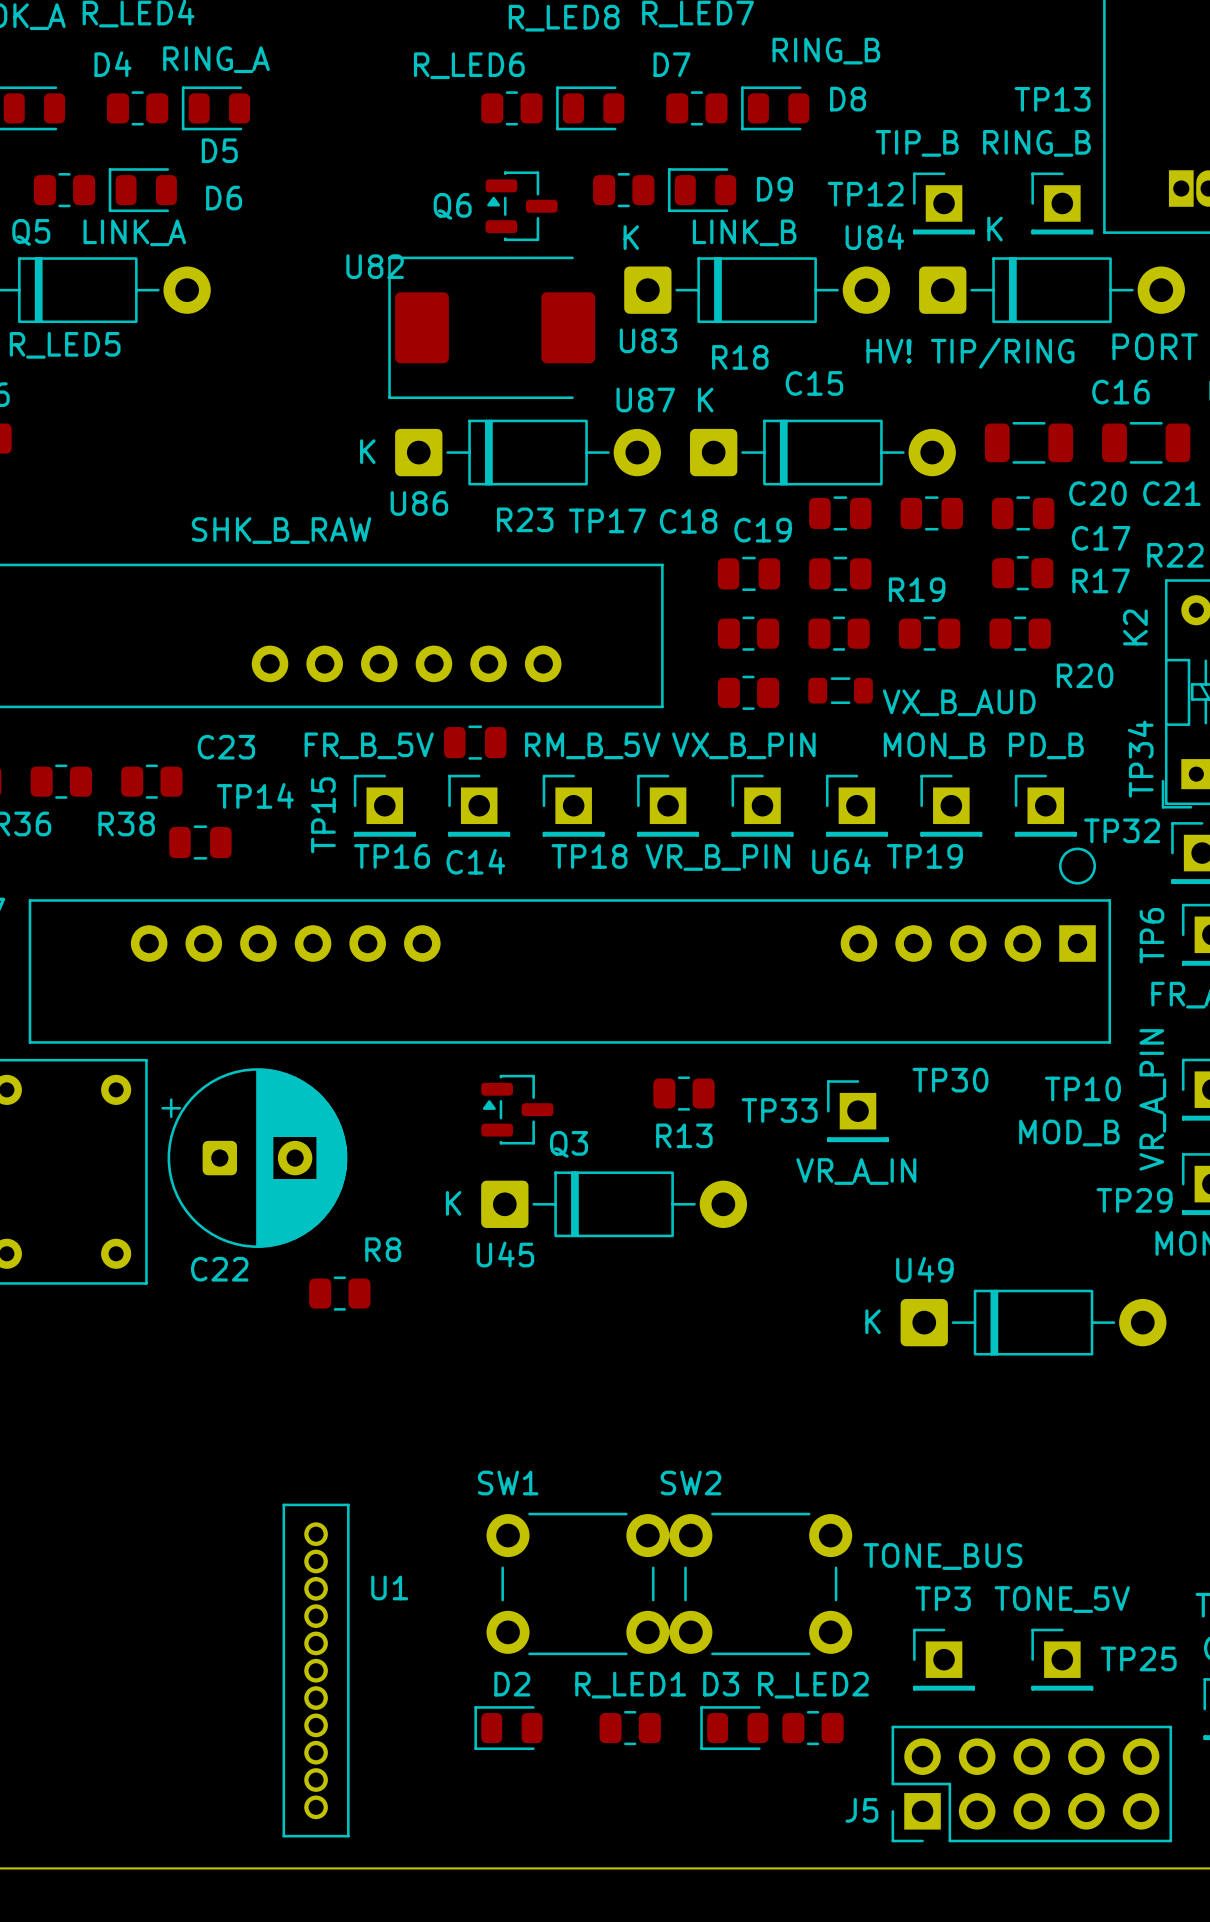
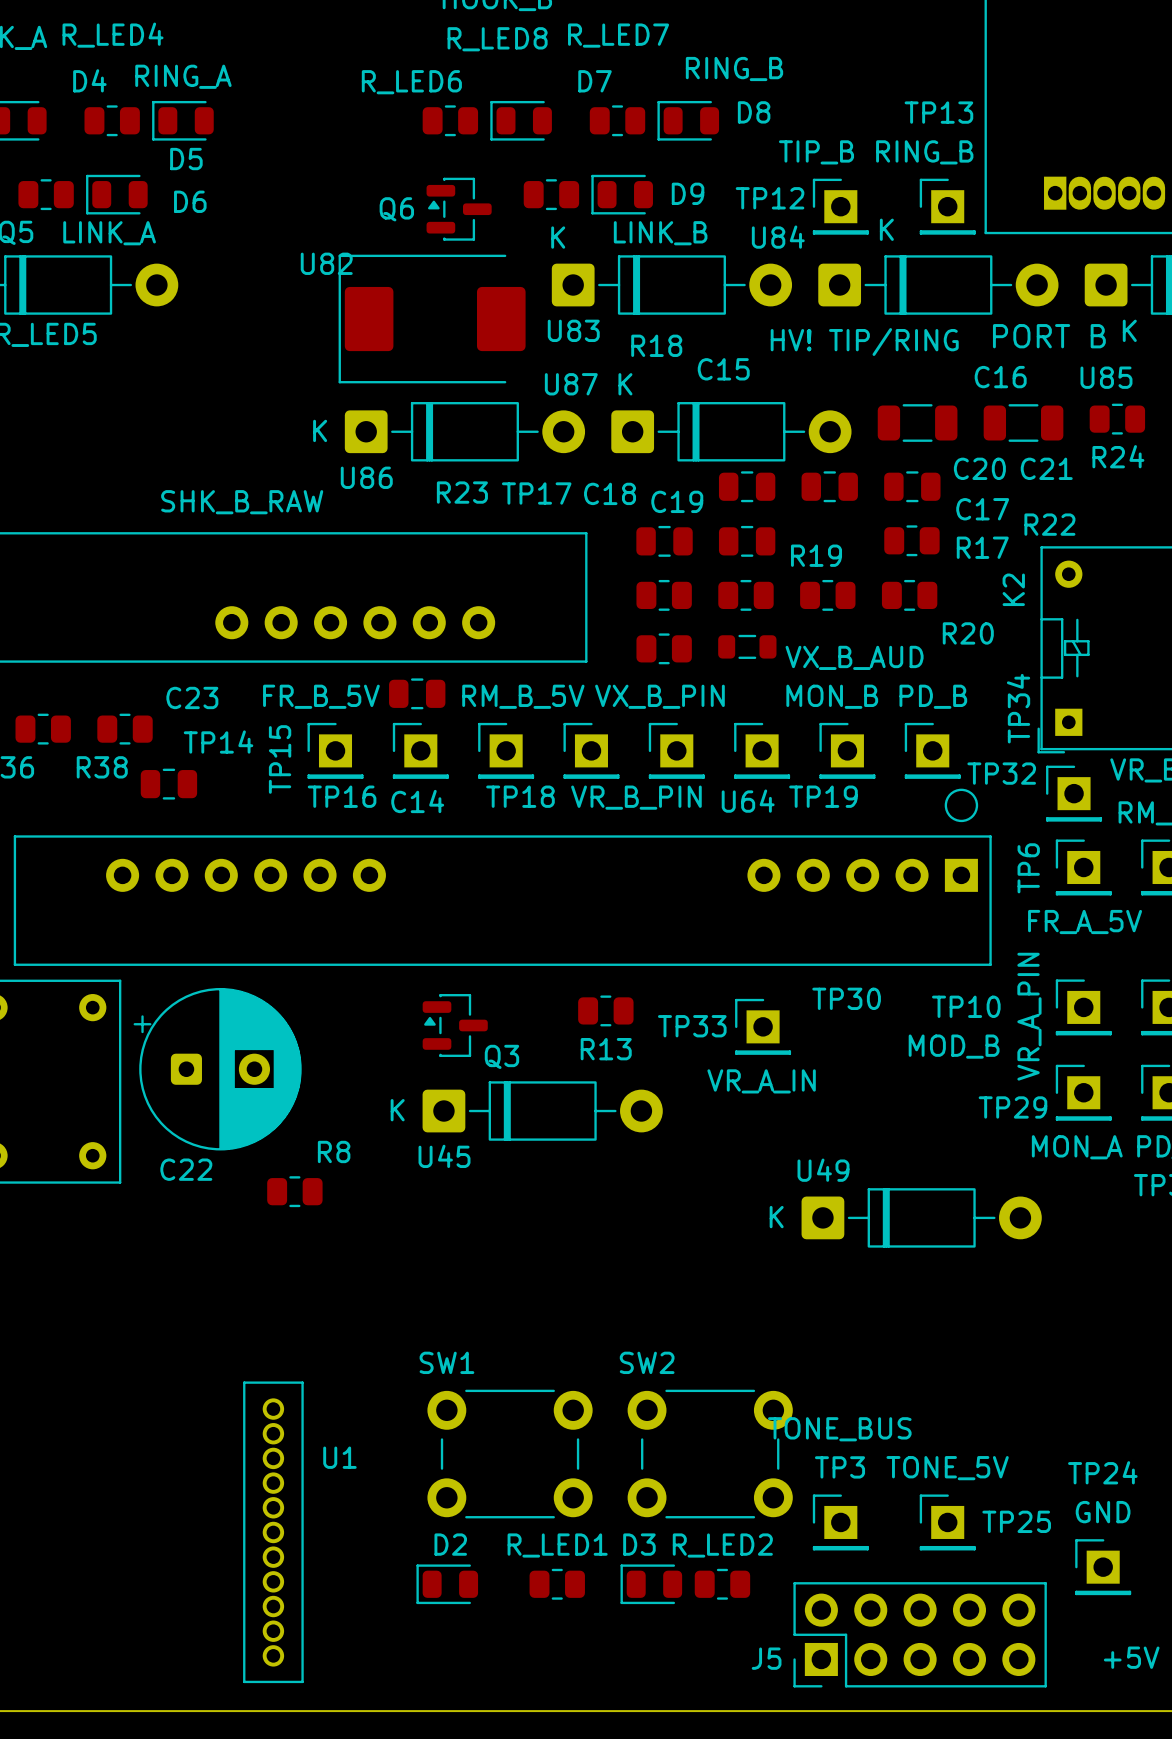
SW2 position: (760, 1583) -> (710, 1454)

